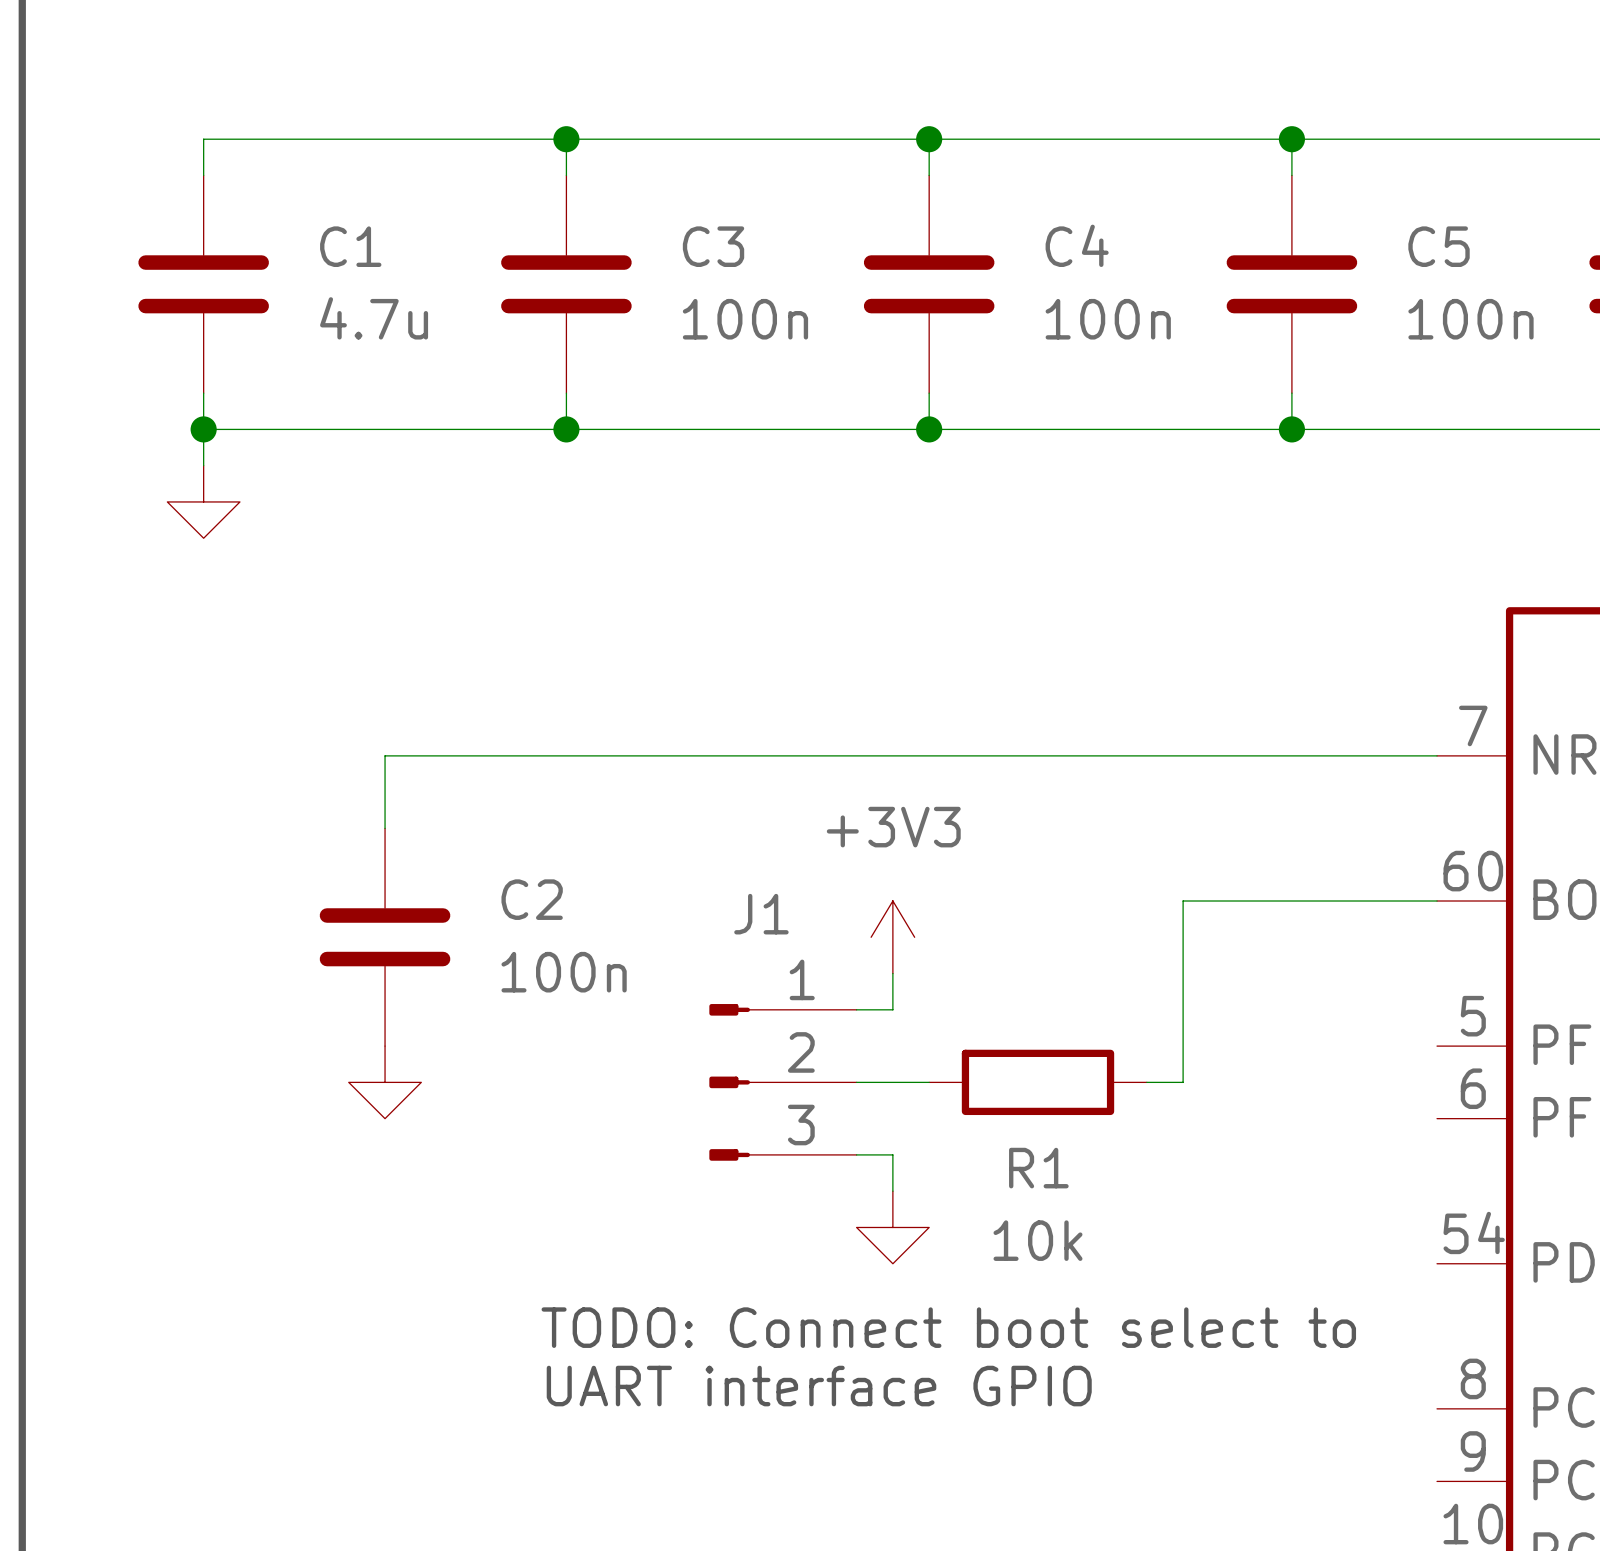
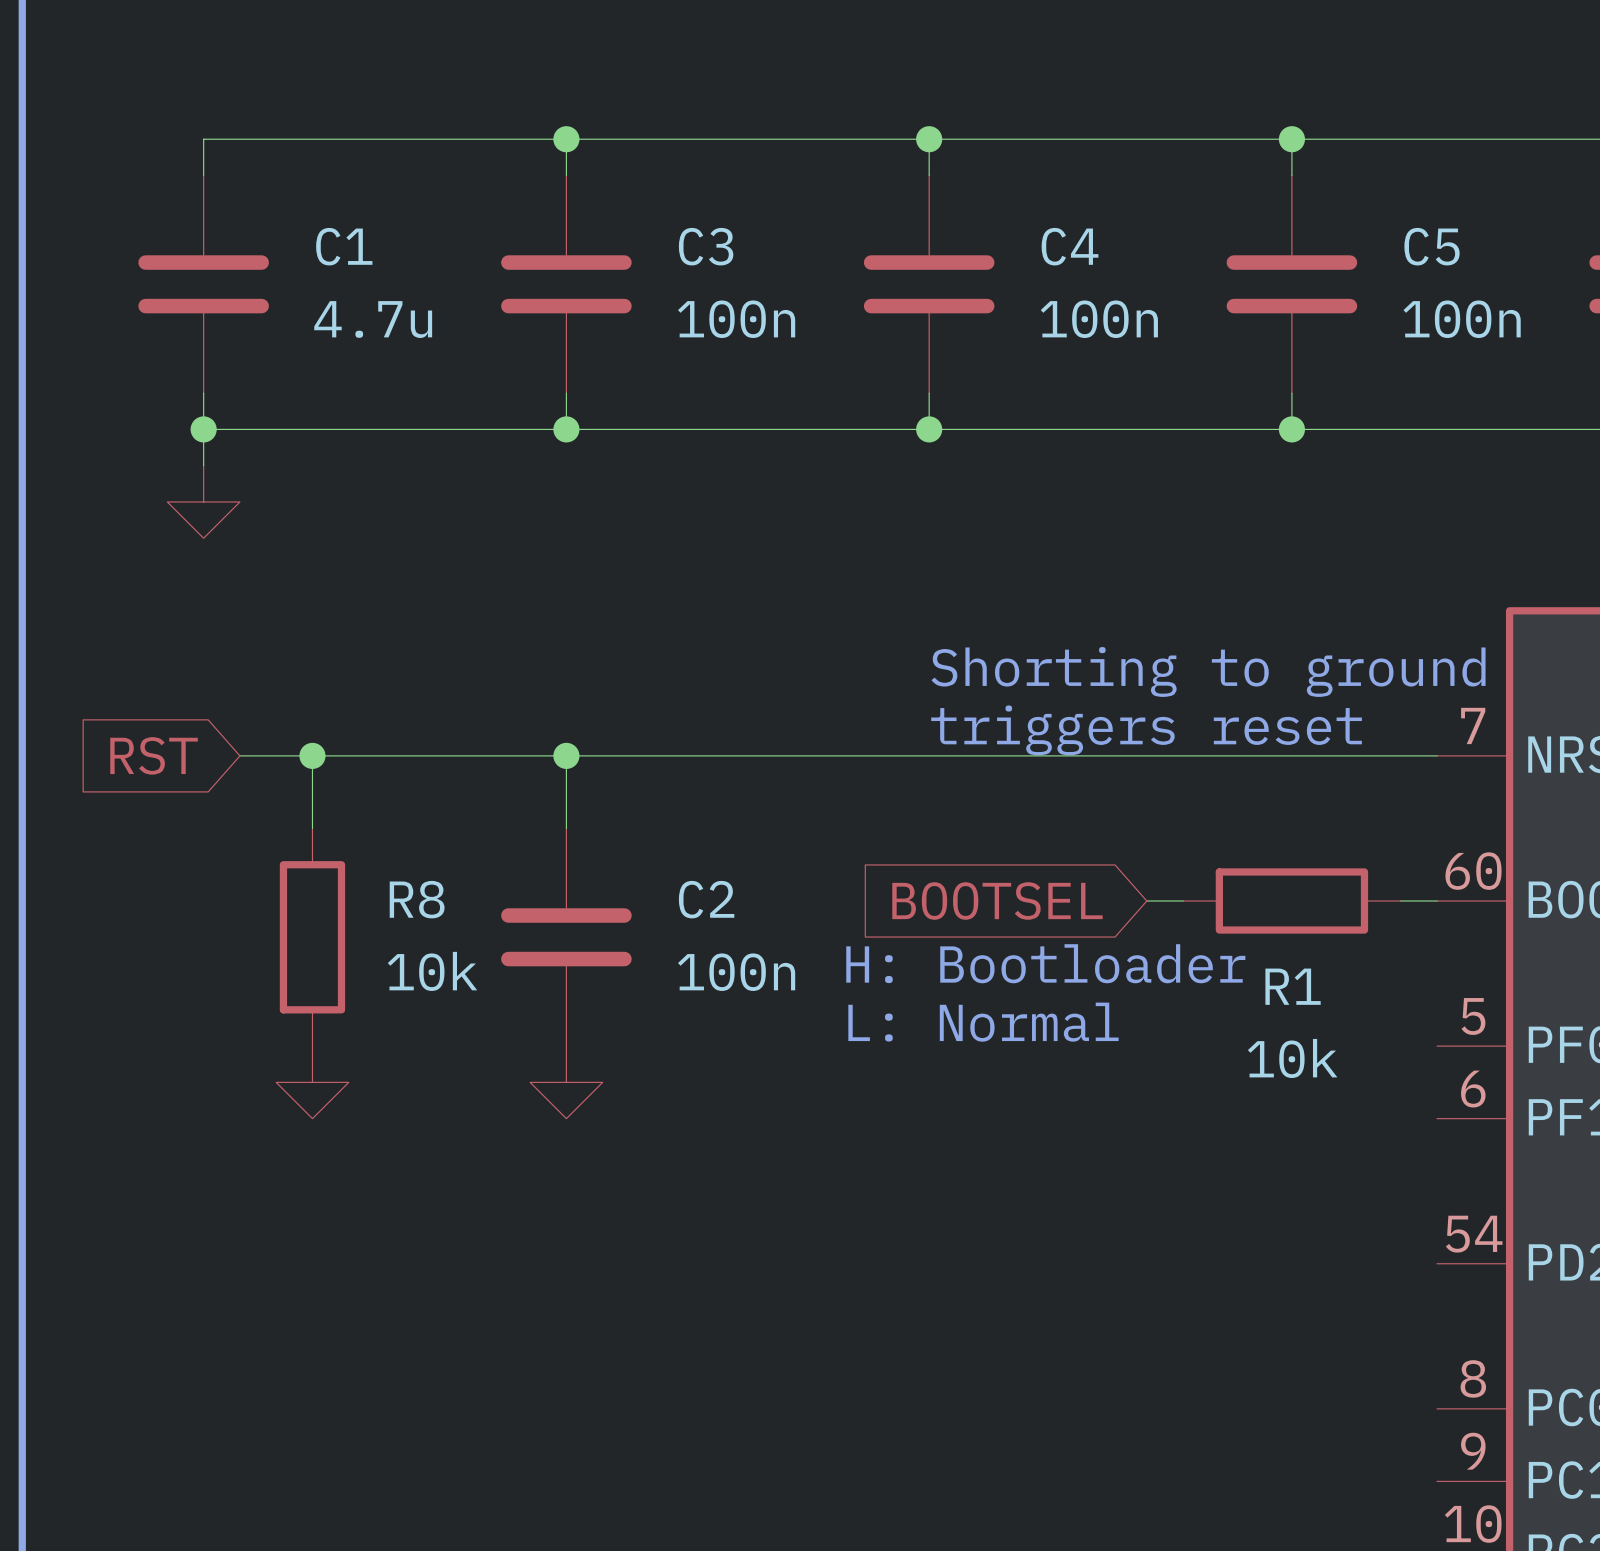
text: none -> Shorting to ground (1208, 671)
text: none -> triggers reset (1146, 730)
global label: none -> RST (154, 755)
wire: none -> (312, 755) (312, 828)
junction: none -> (312, 755)
wire: (385, 755) (385, 828) -> (385, 755) (239, 755)
wire: none -> (566, 755) (566, 828)
junction: none -> (566, 755)
global label: none -> BOOTSEL (997, 901)
wire: none -> (1146, 901) (1183, 901)
wire: (1400, 901) (1183, 901) (1183, 1082) (1146, 1082) -> none
R8: none -> 10k (312, 937)
C2 position: (385, 937) -> (566, 937)
power symbol: +3V3 (892, 937) -> none
text: none -> H: Bootloader (1045, 963)
wire: (892, 973) (892, 1009) (856, 1009) -> none
text: none -> L: Normal (983, 1022)
power symbol position: (385, 1082) -> (312, 1082)
power symbol: none -> (566, 1082)
J1: (782, 1082) -> none
wire: (856, 1082) (929, 1082) -> none
R1 position: (1037, 1082) -> (1291, 901)
wire: (856, 1154) (892, 1154) (892, 1191) -> none
power symbol: (892, 1227) -> none
text: TODO: Connect boot select to (948, 1327) -> none
text: UART interface GPIO (819, 1386) -> none

